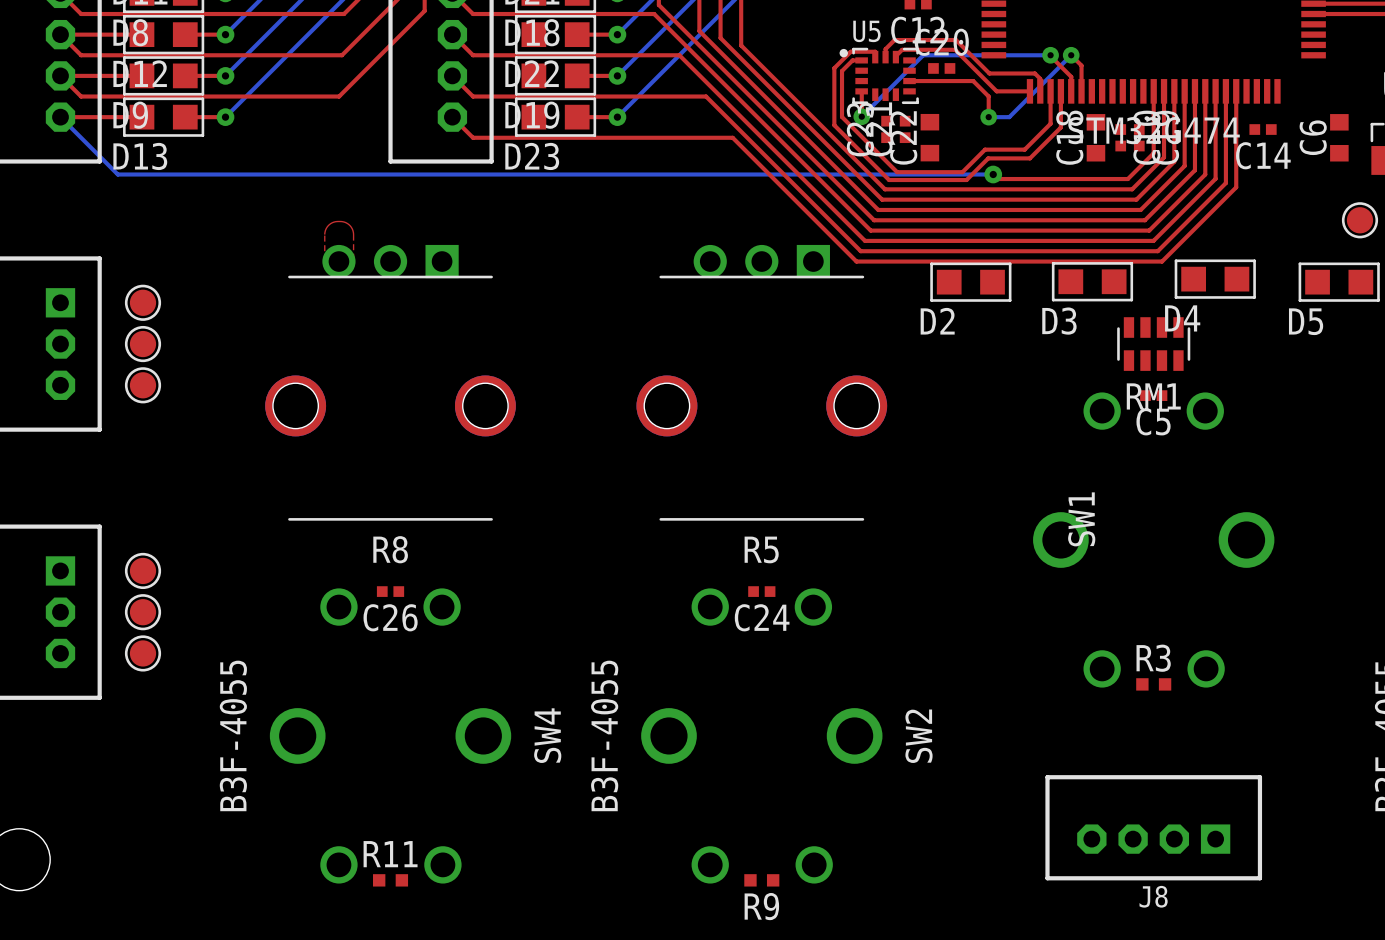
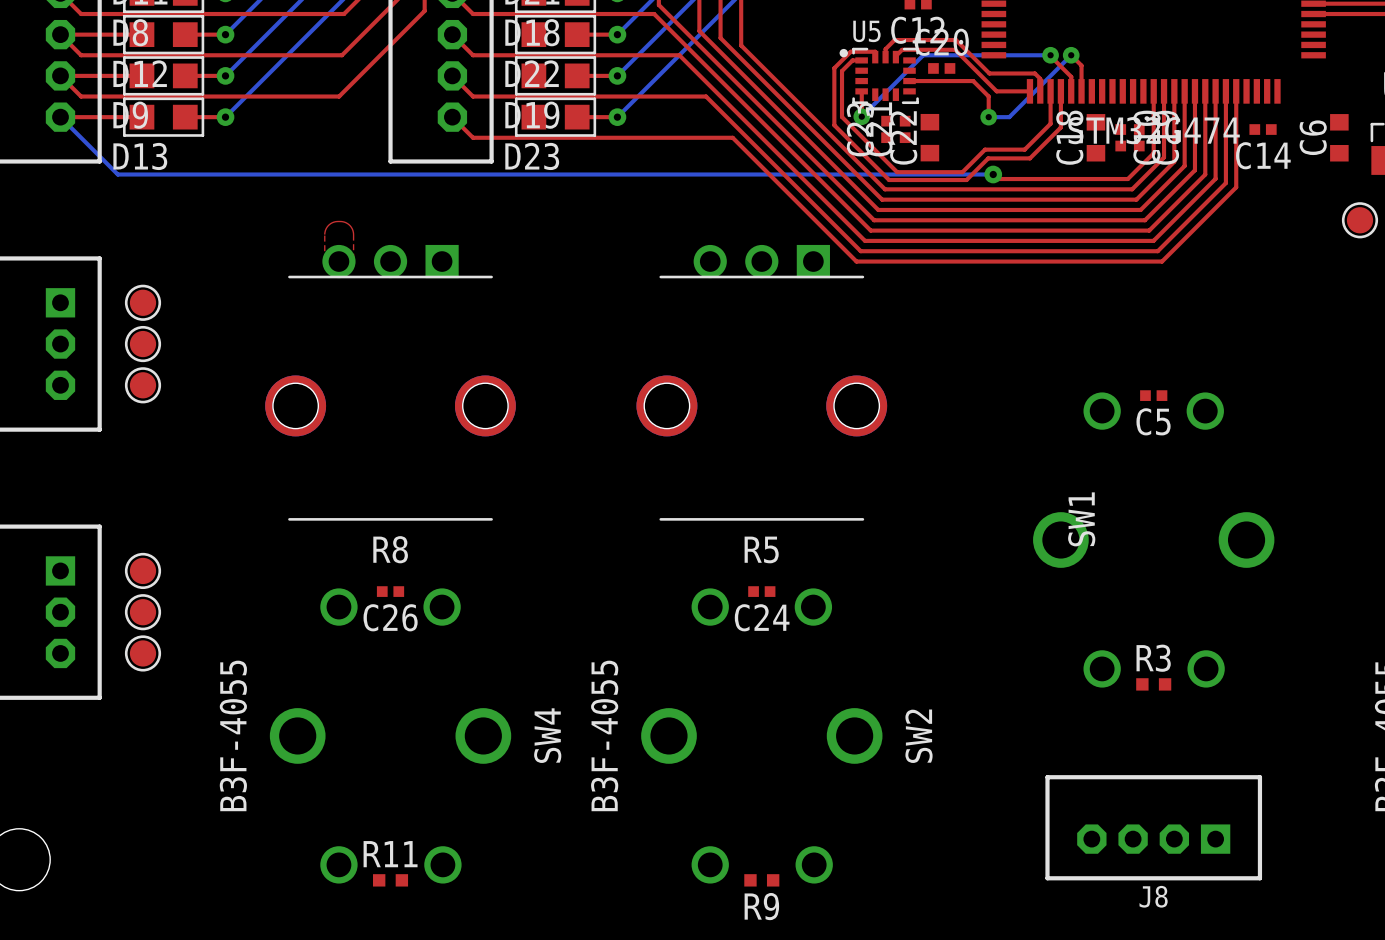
D4: (1215, 279) -> none
D3: (1092, 281) -> none
D2: (970, 282) -> none
D5: (1339, 282) -> none
RM1: (1153, 344) -> none

